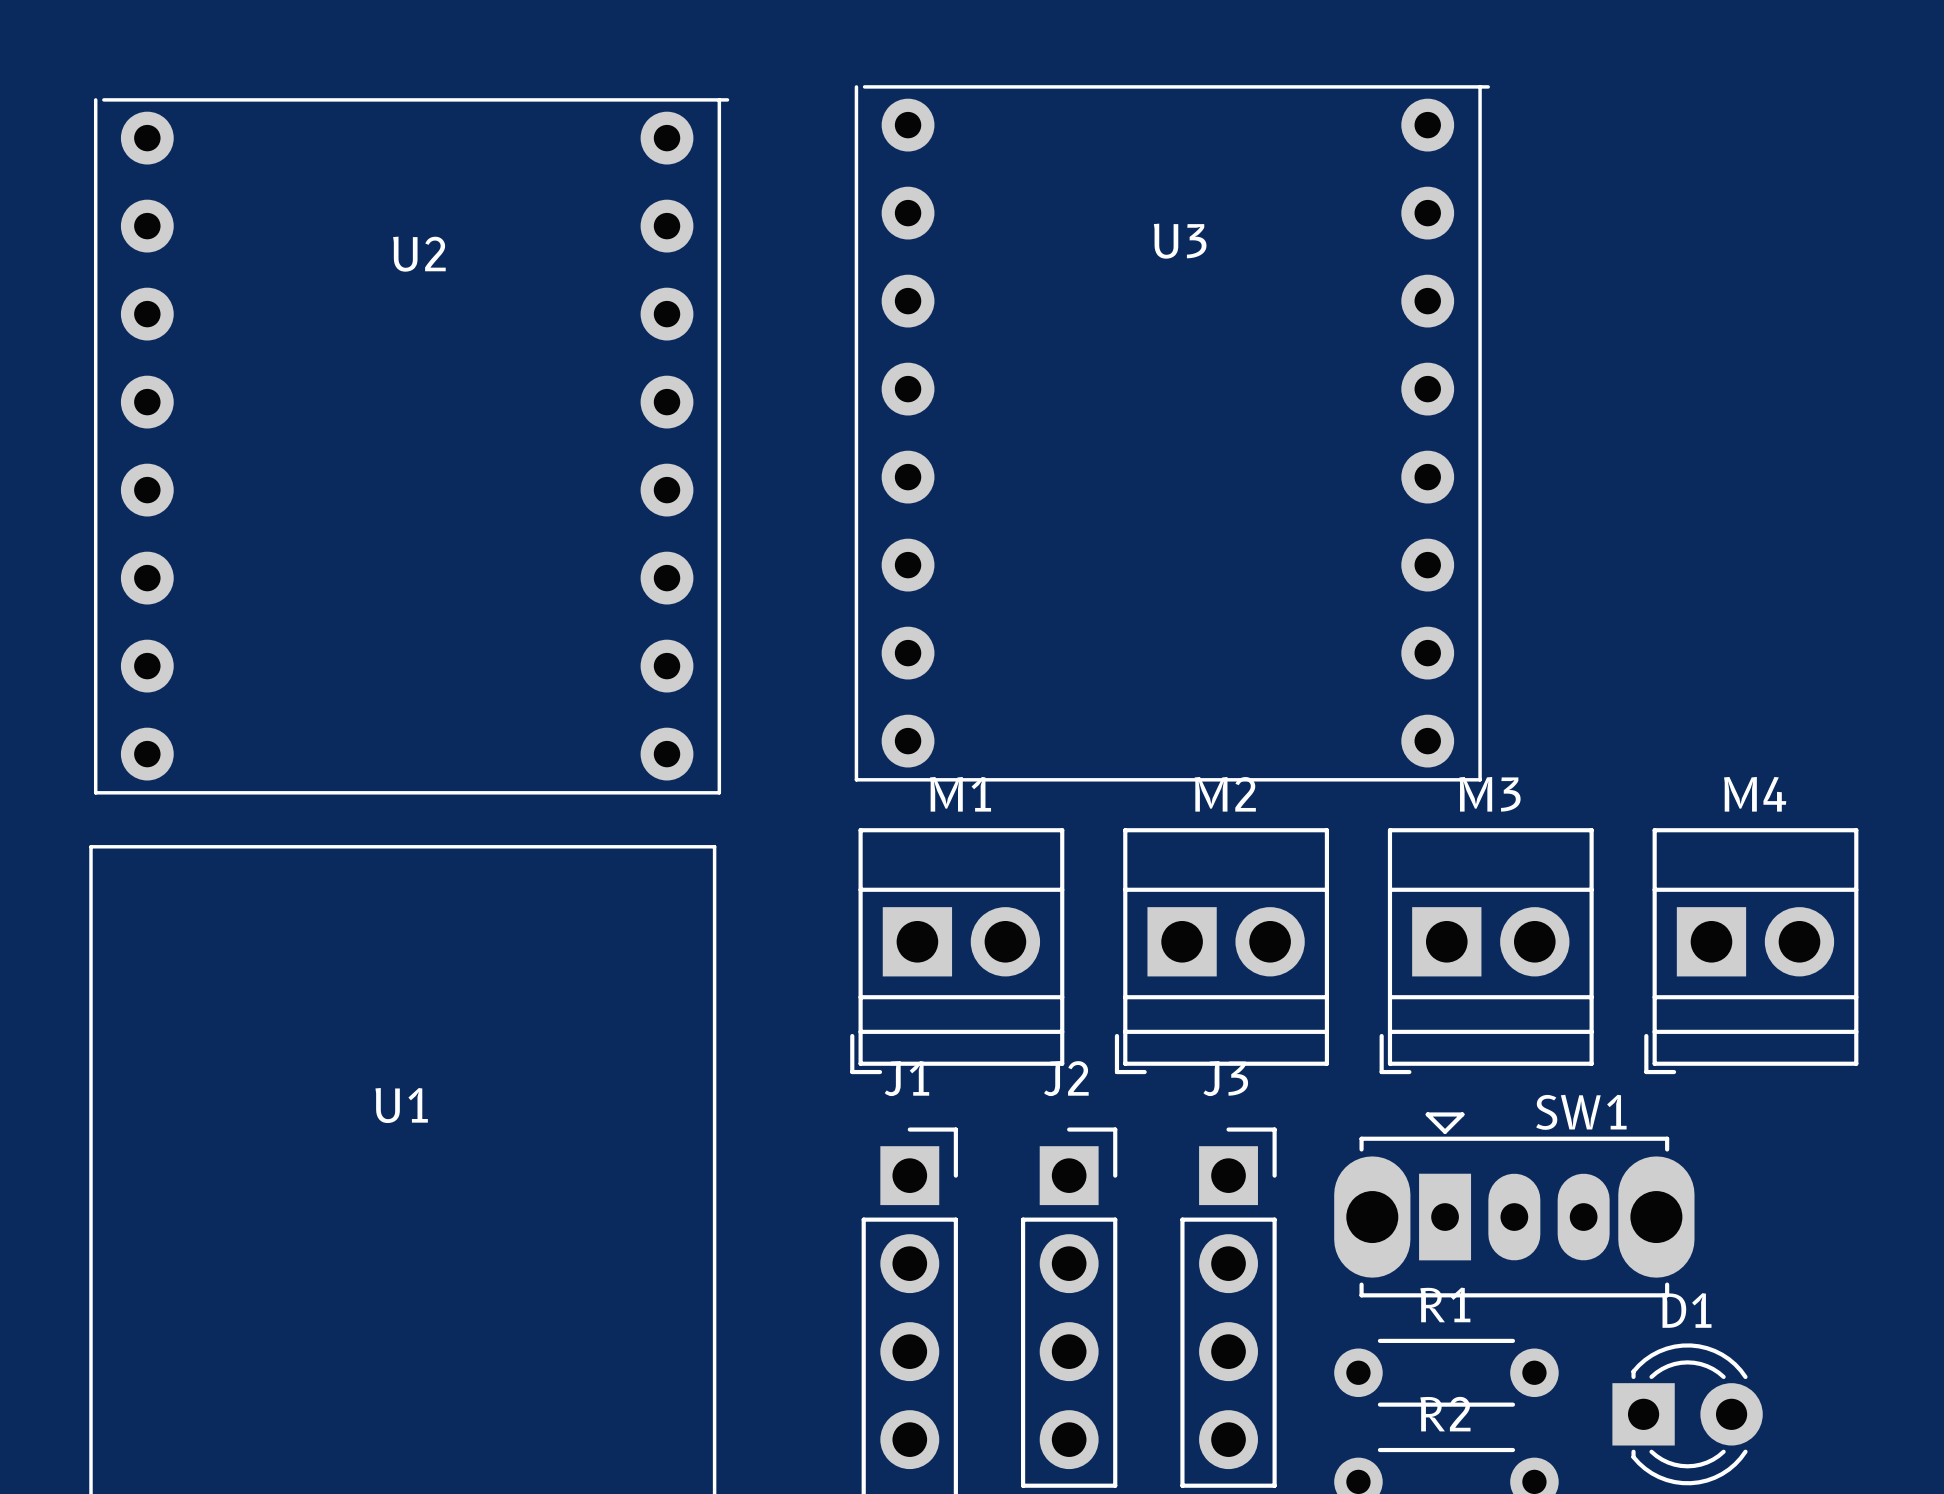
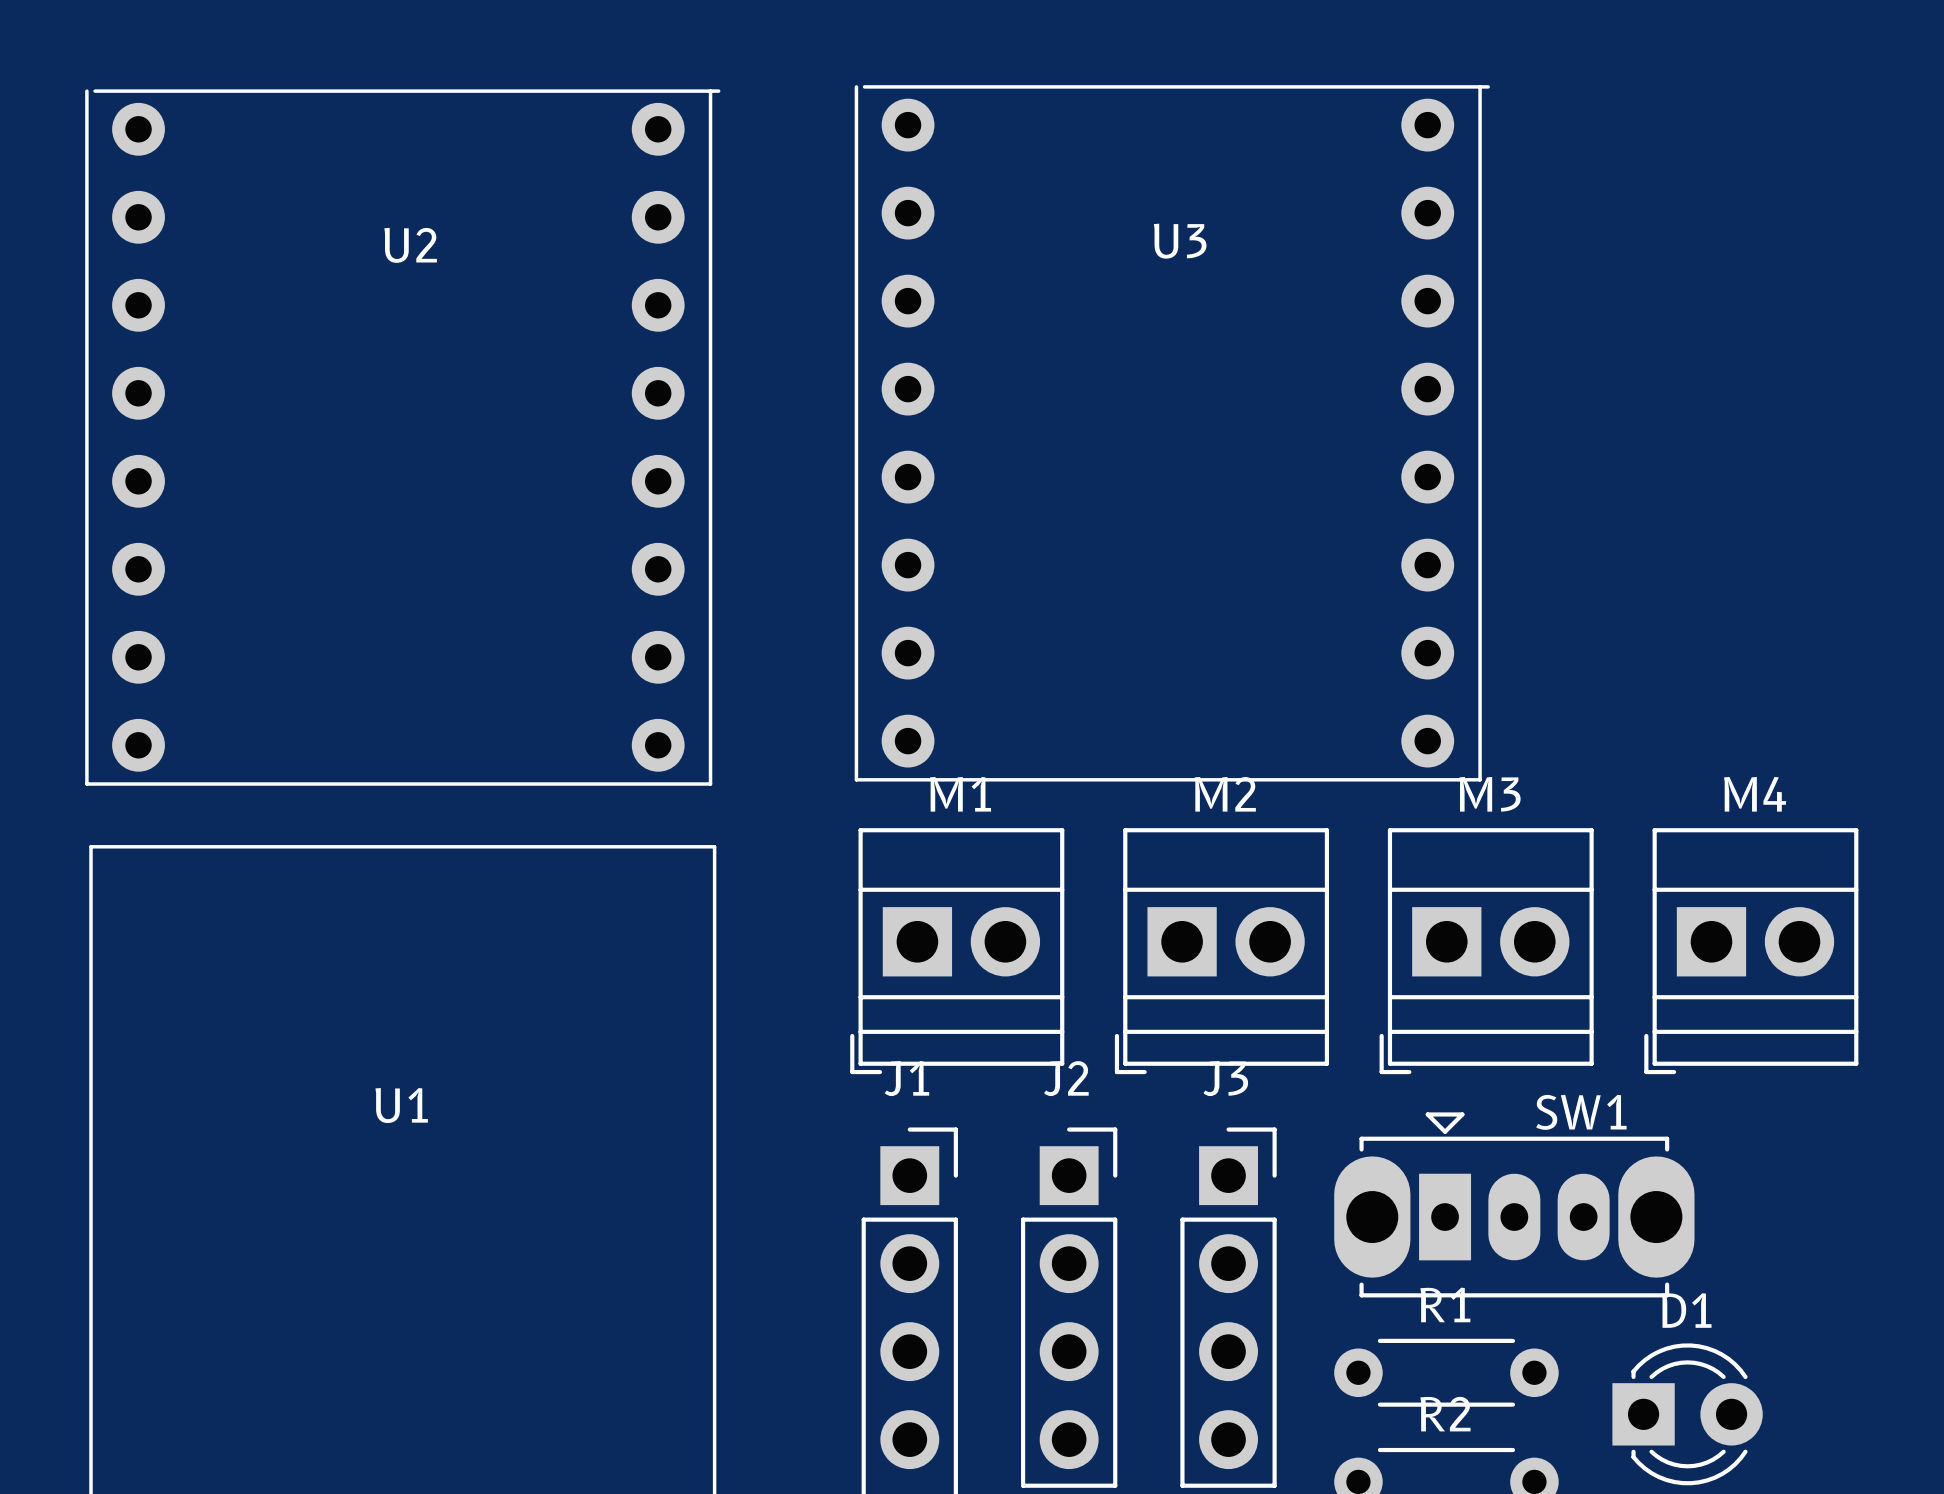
U2 position: (411, 446) -> (402, 437)

